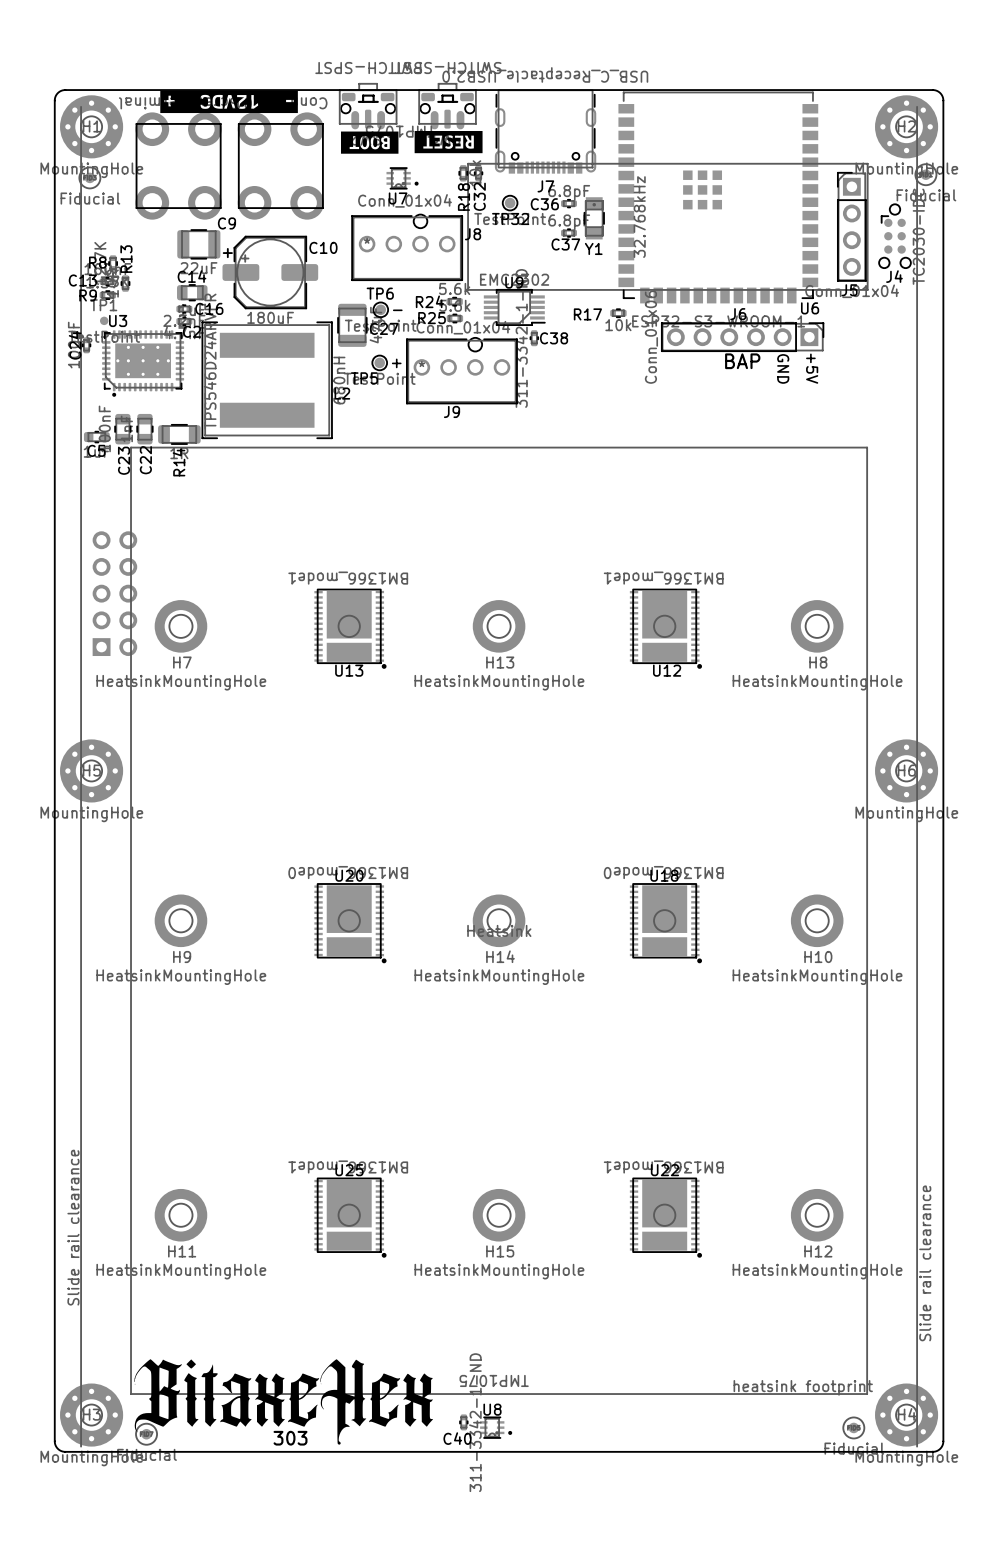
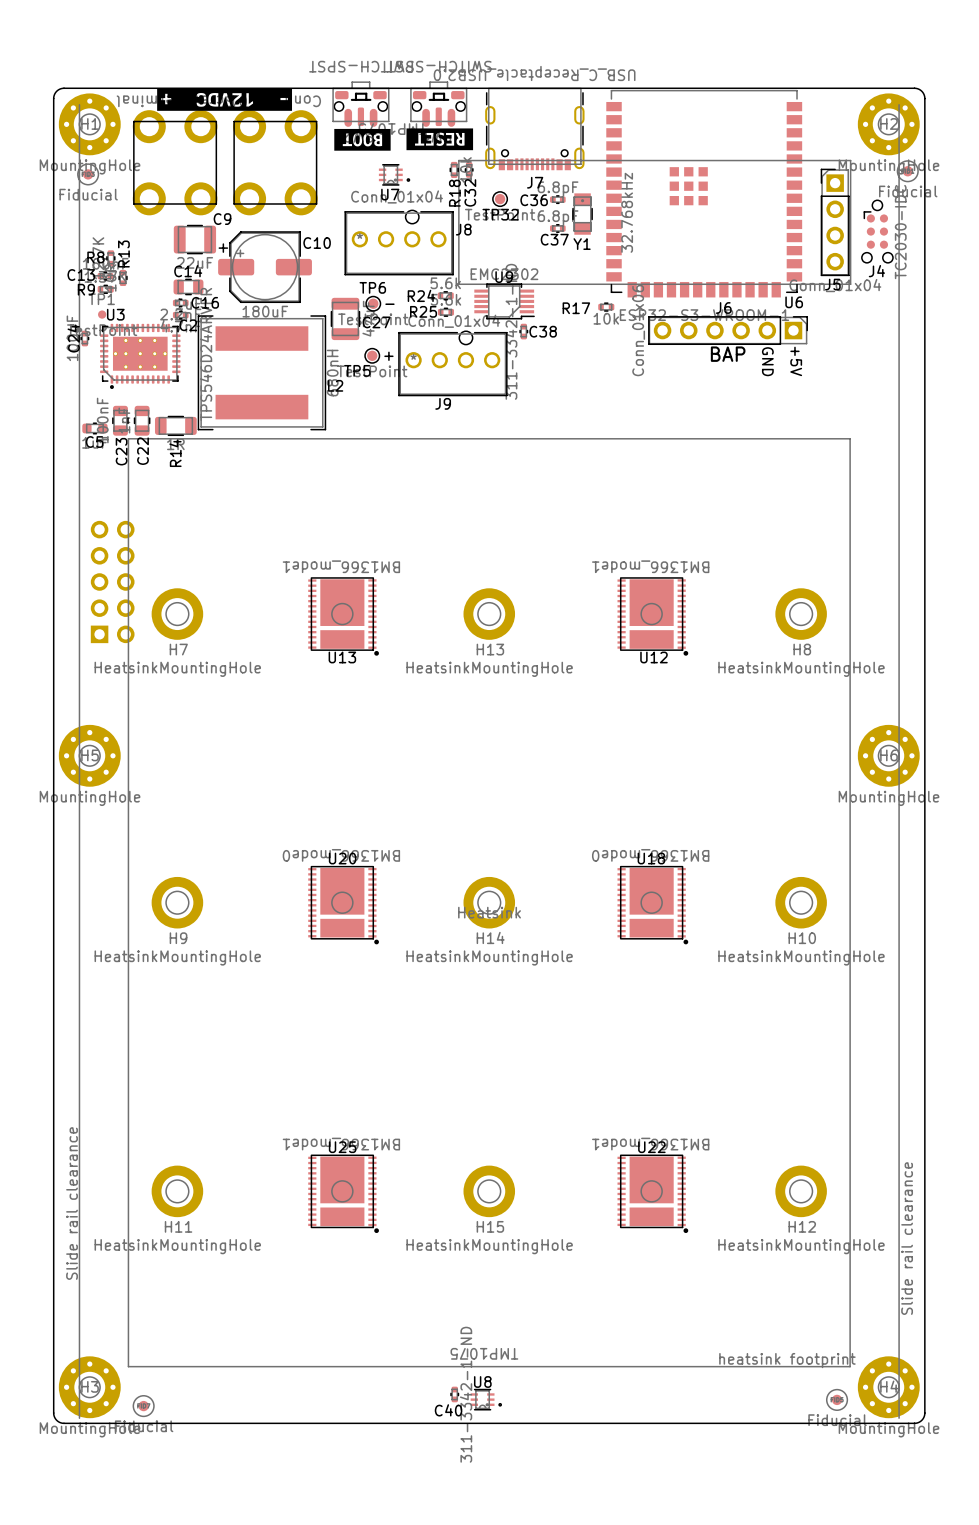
drawing: [134, 1359, 434, 1445] -> none
text: 303 (290, 1438) -> none

